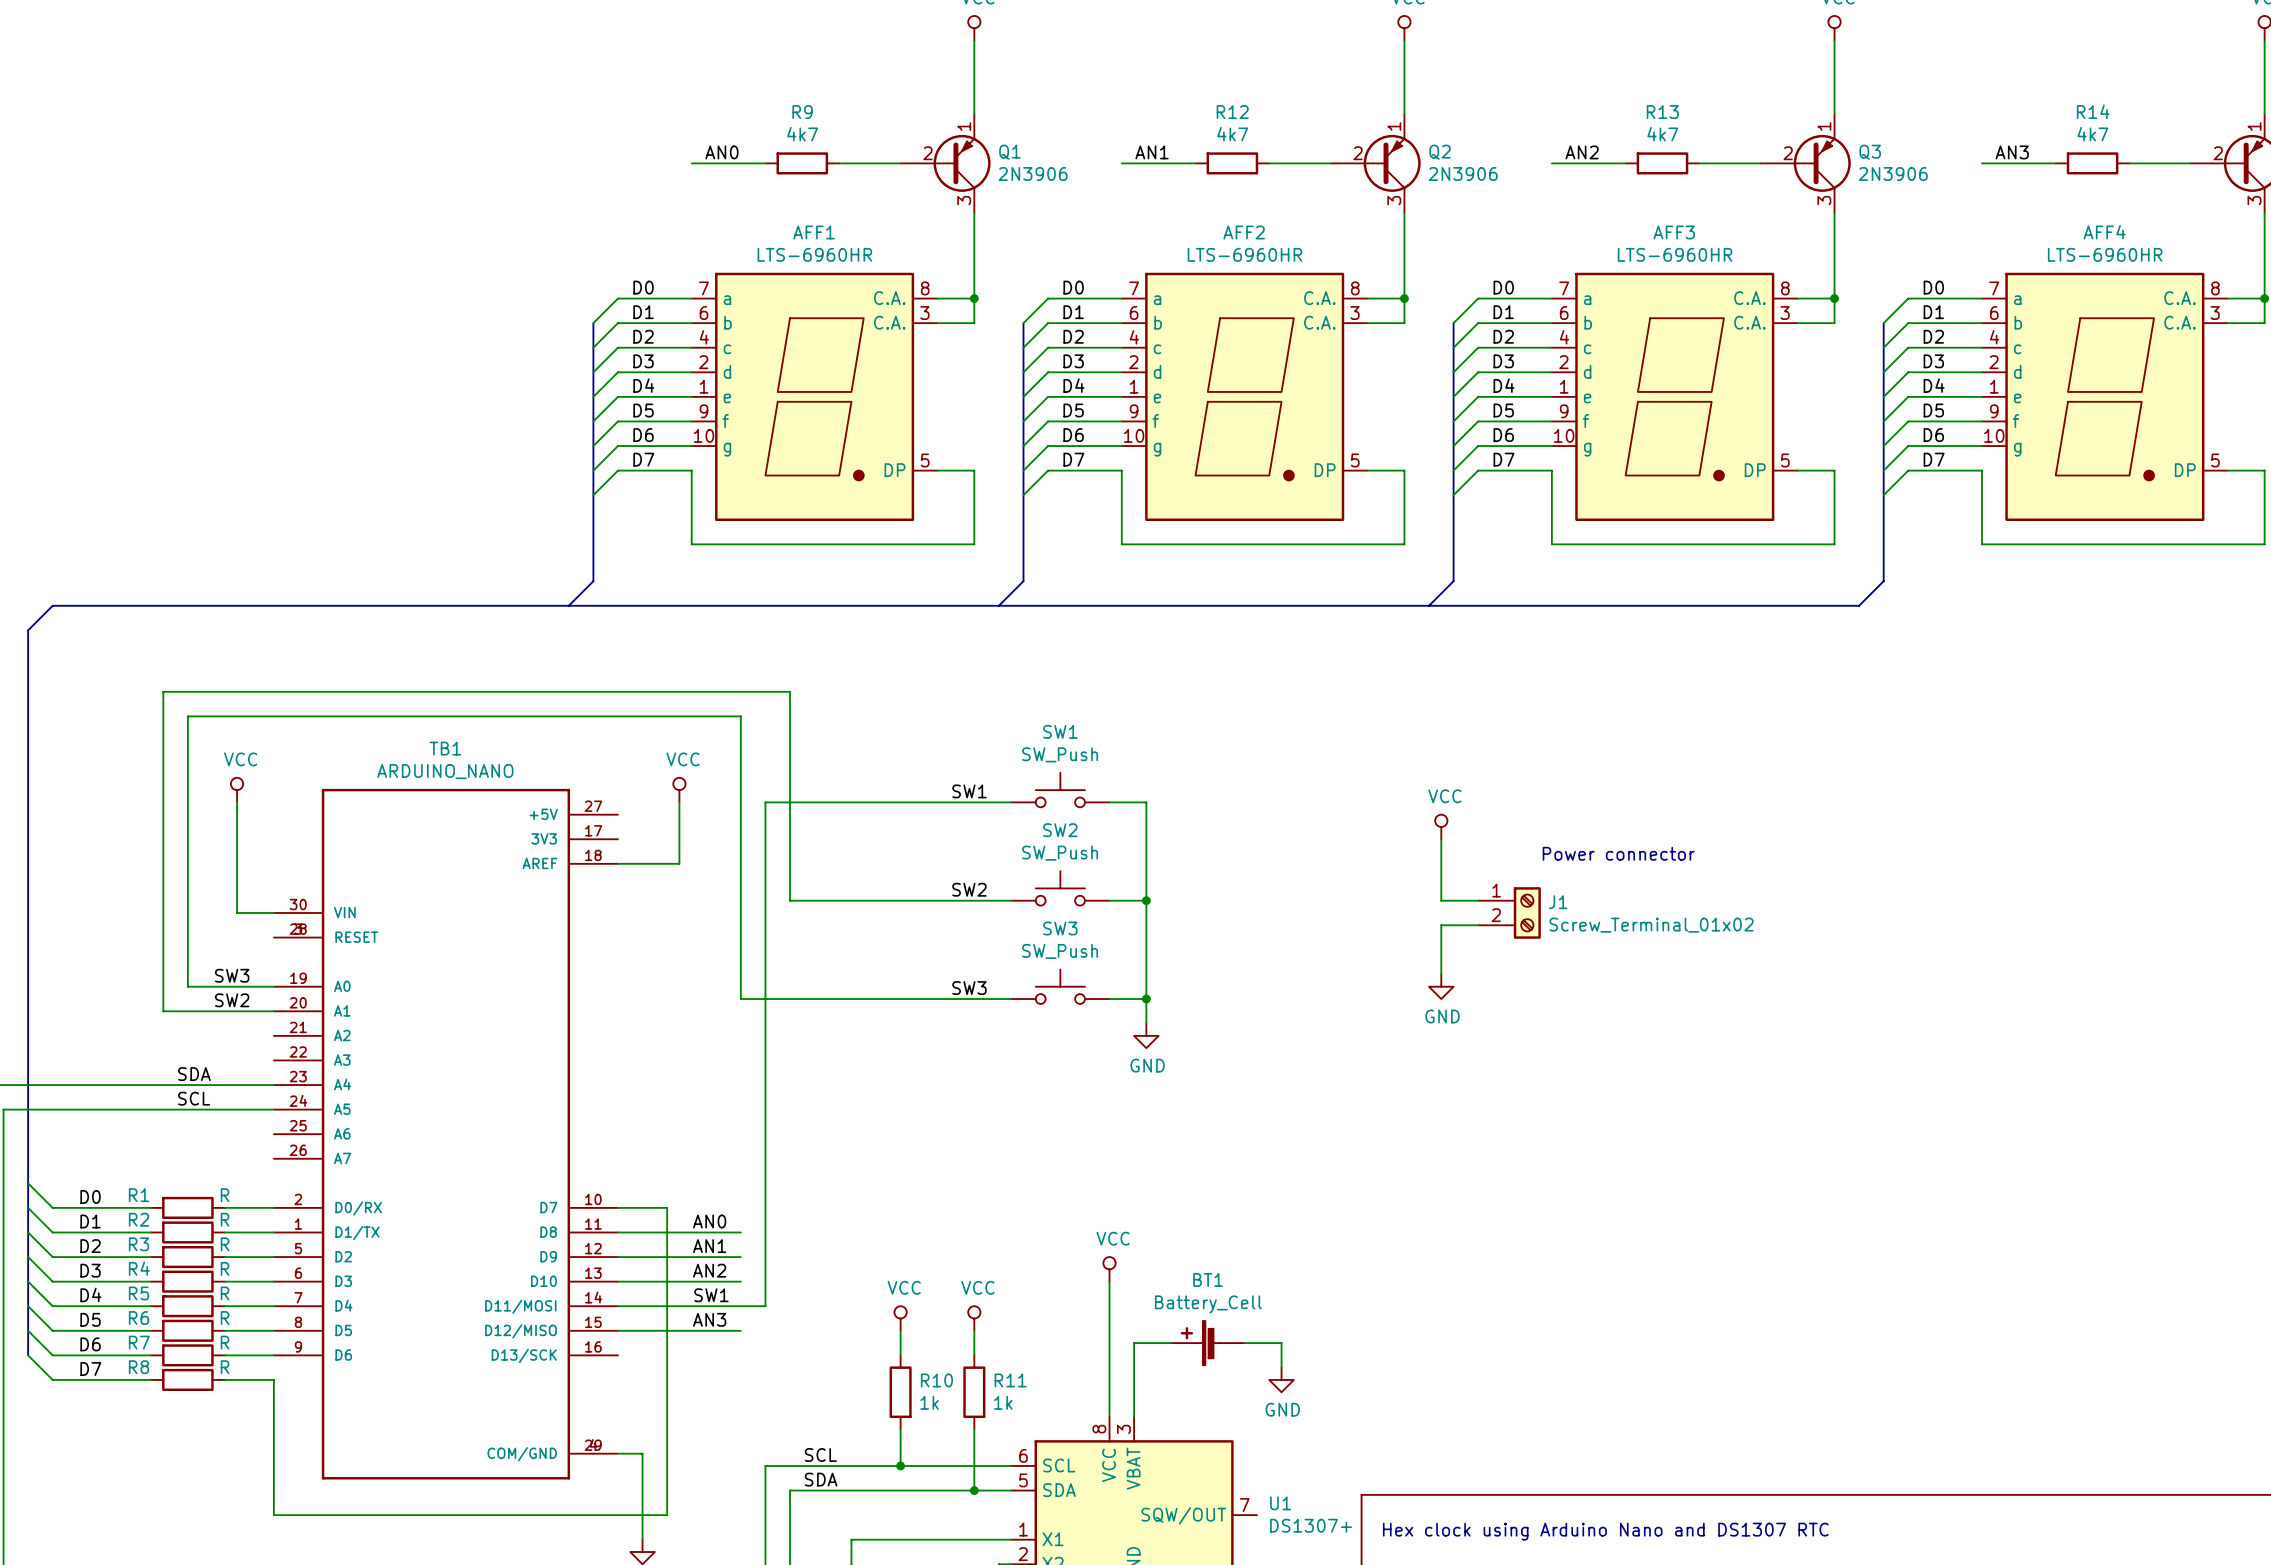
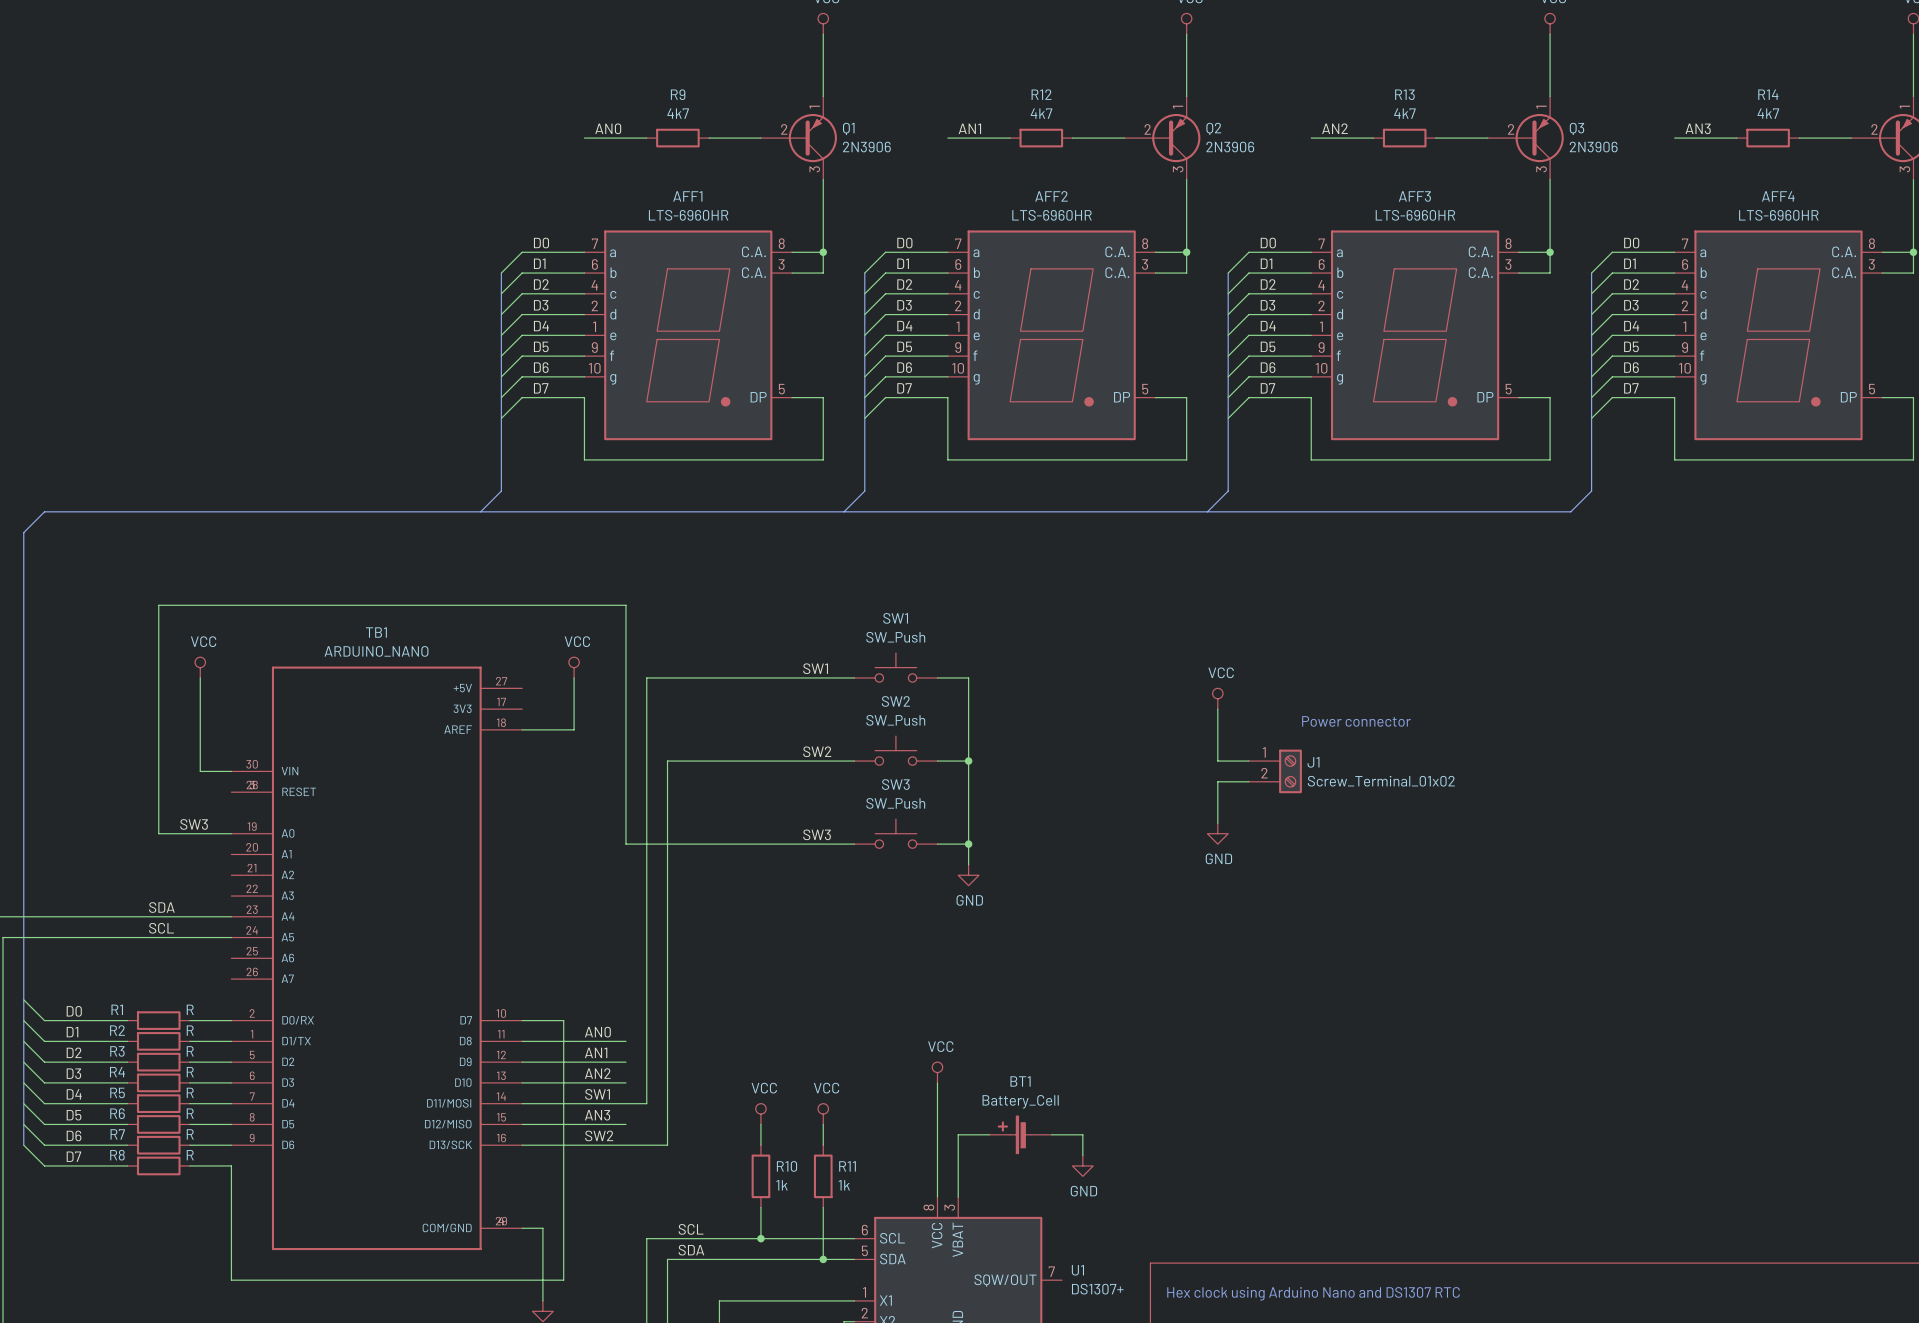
wire: (790, 900) (790, 691) (163, 691) (163, 1011) (273, 1011) -> (667, 761) (667, 1145) (522, 1145)
label: SW2 (232, 1000) -> none
label: none -> SW2 (599, 1135)

